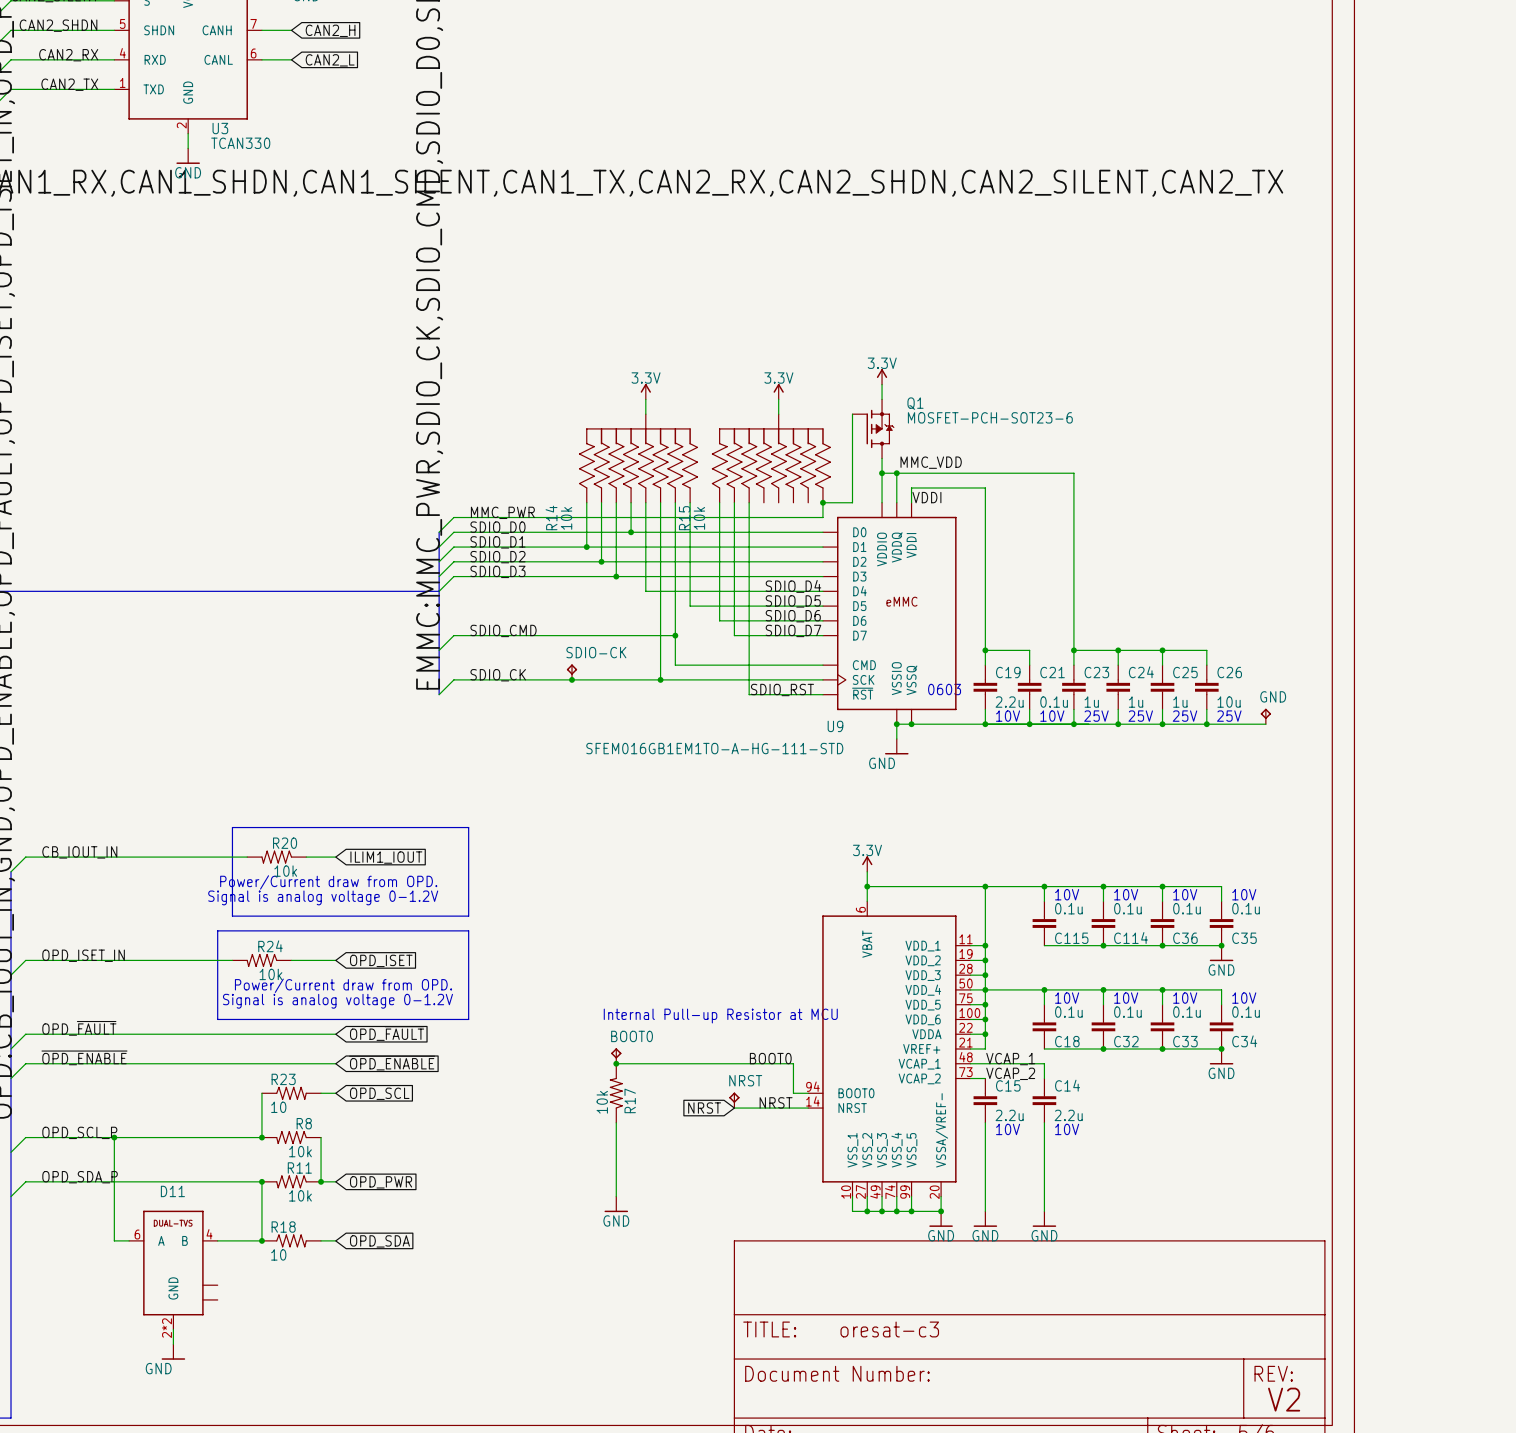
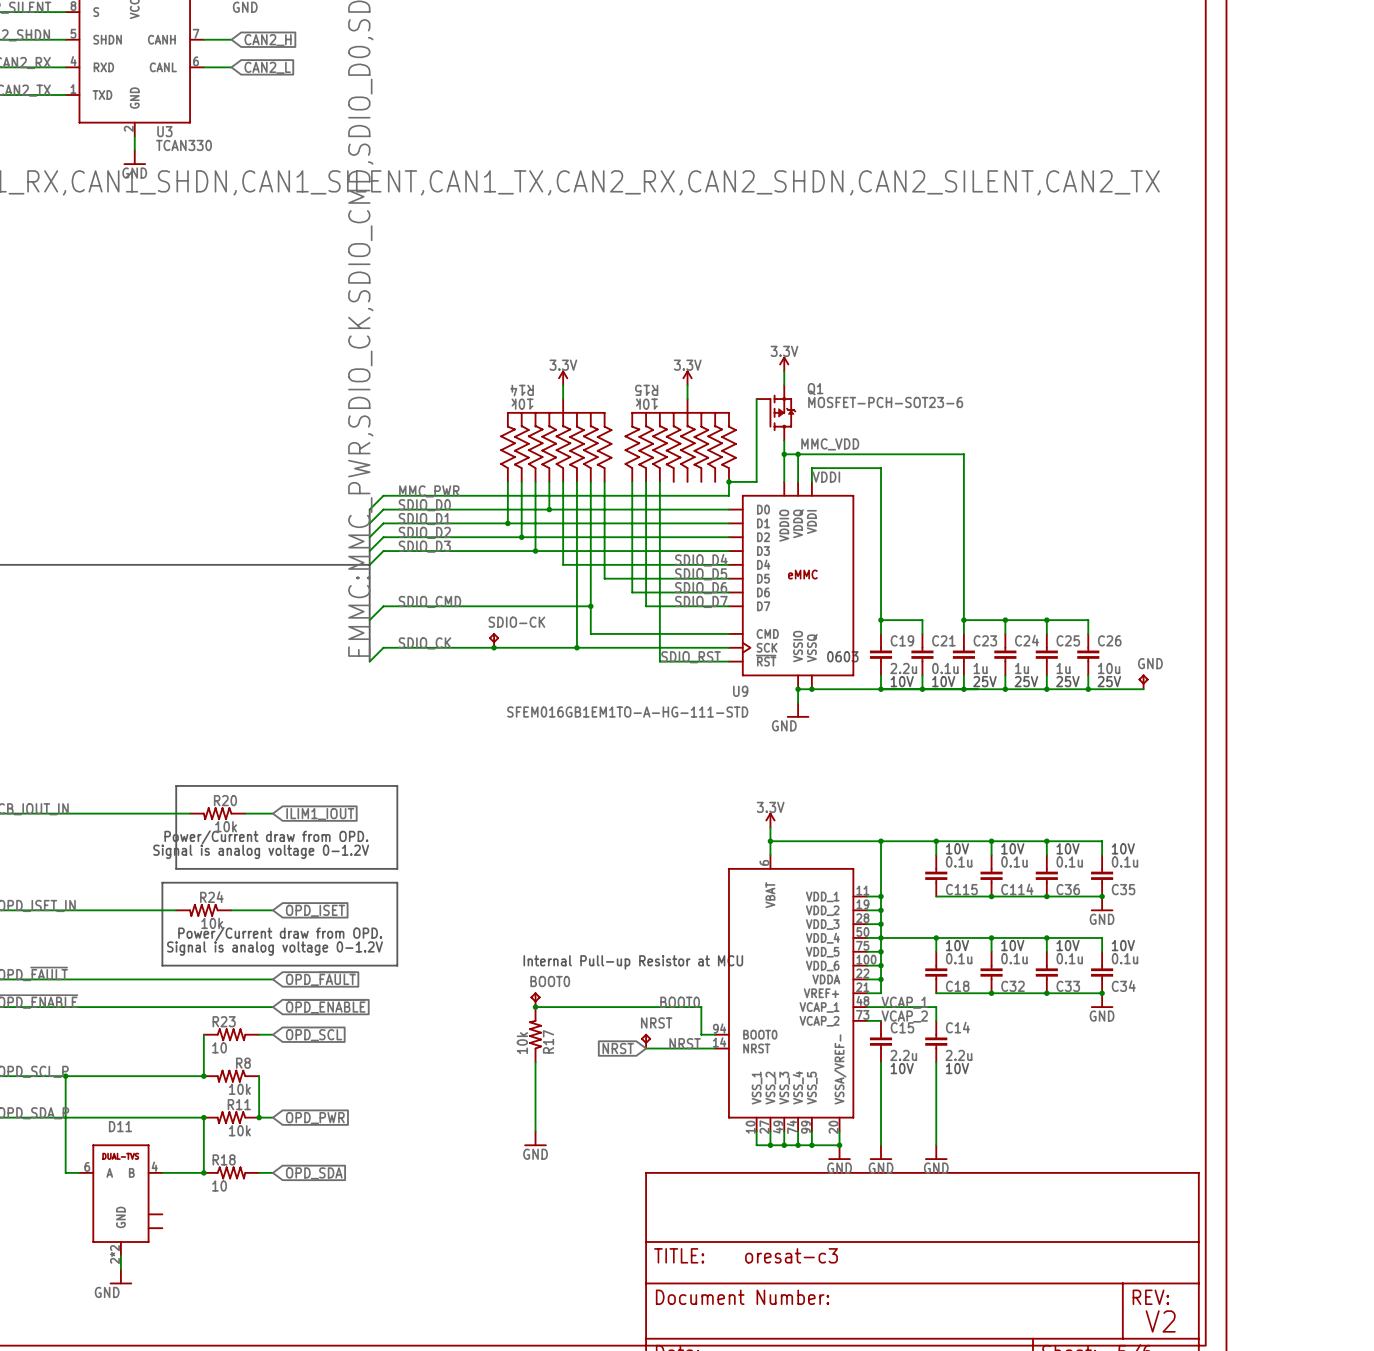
R14 name rotation: 0° (551, 517) -> 90° counterclockwise (522, 390)
R14 name position: R14 (551, 517) -> R14 (522, 390)
R14 value rotation: 0° (566, 518) -> 90° counterclockwise (522, 404)
R14 value position: 10k (566, 518) -> 10k (522, 404)
R15 name rotation: 0° (684, 518) -> 90° counterclockwise (646, 390)
R15 name position: R15 (684, 518) -> R15 (646, 390)
R15 value rotation: 0° (699, 518) -> 90° counterclockwise (646, 404)
R15 value position: 10k (699, 518) -> 10k (646, 404)

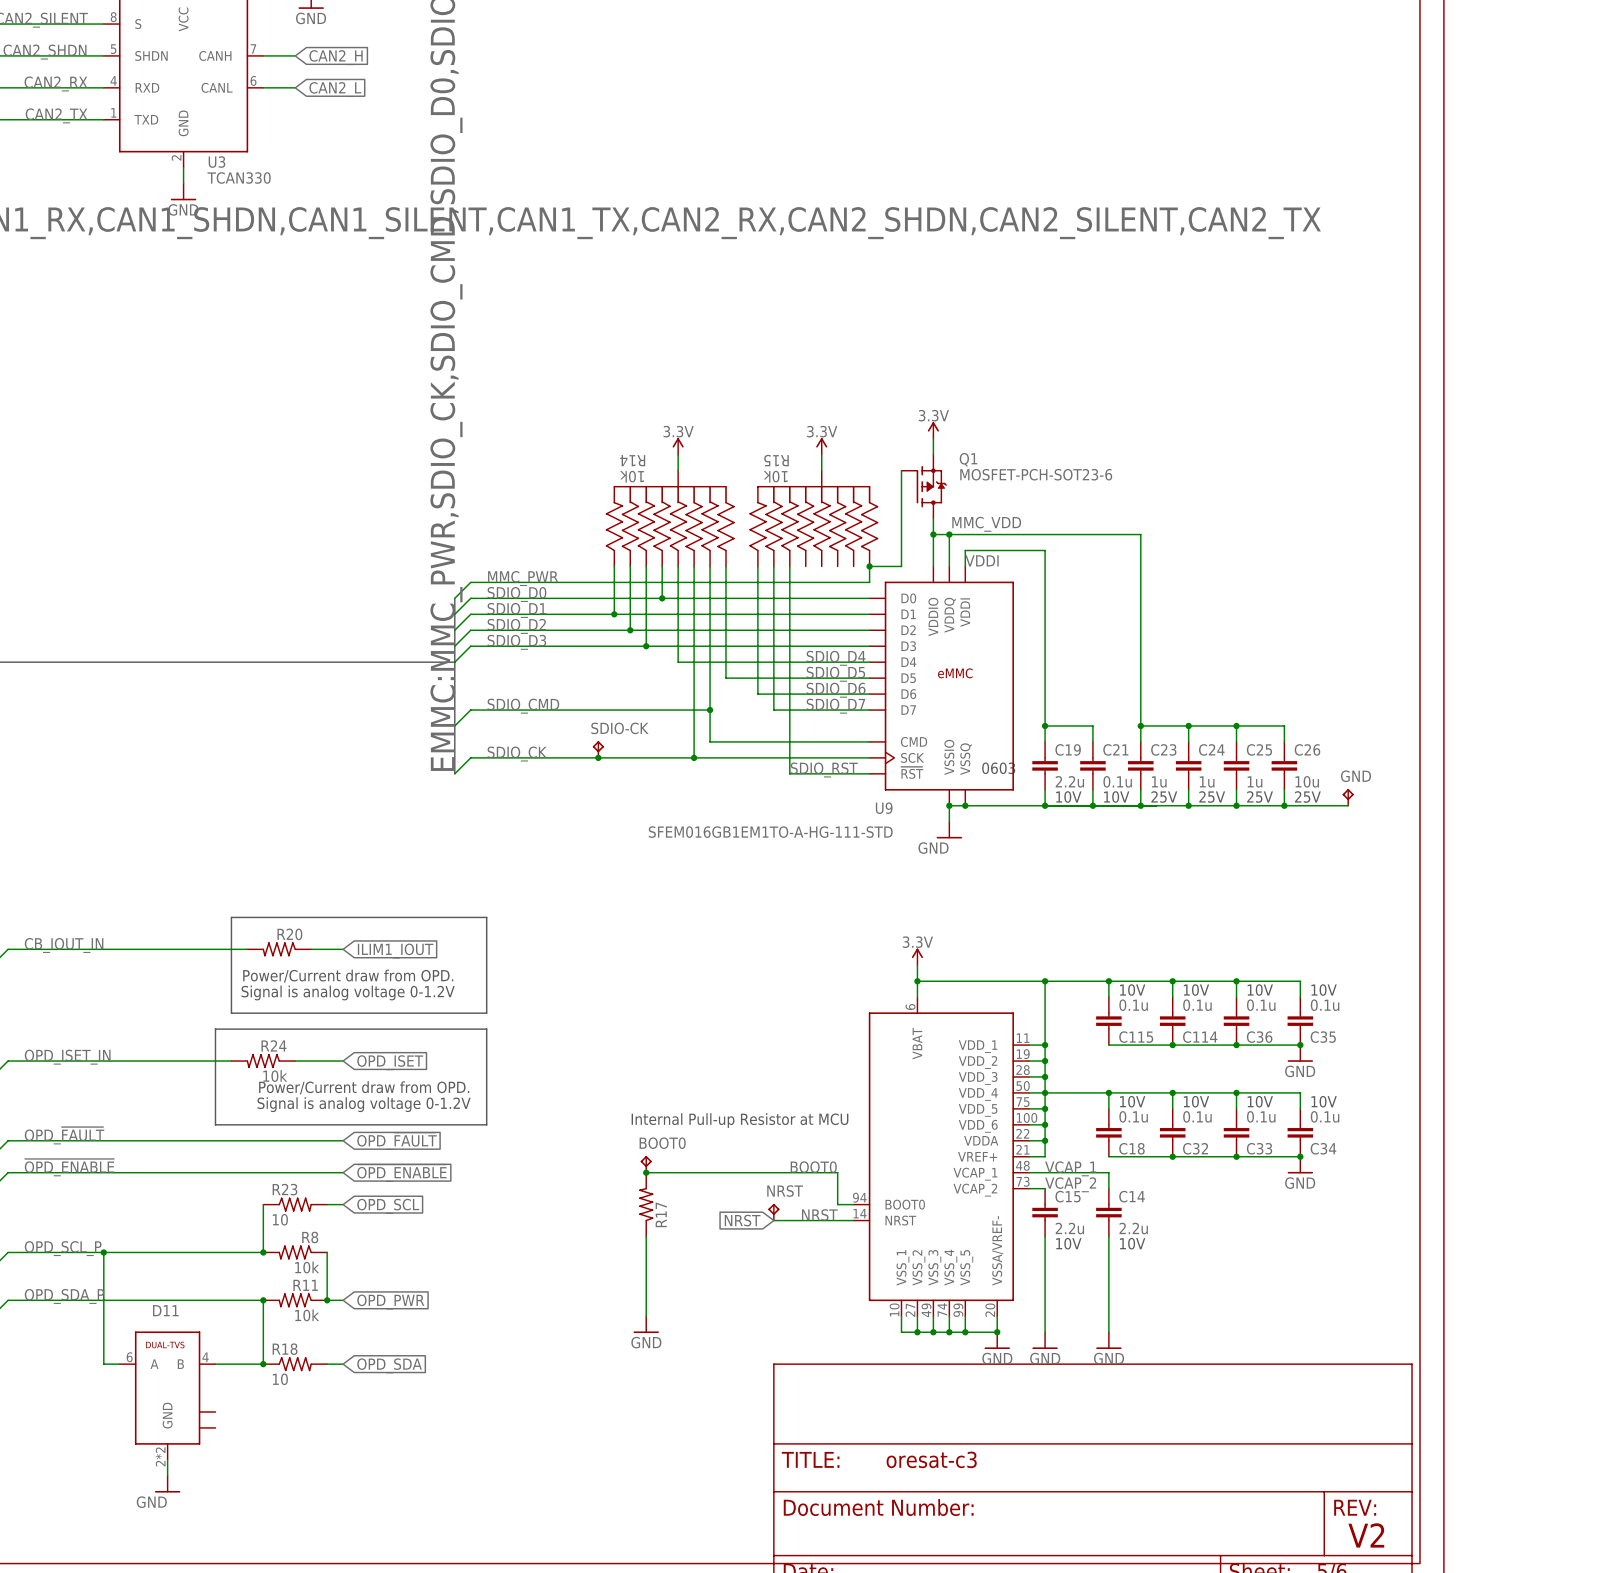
R20 value: 10k (226, 826) -> none
R17 value: 10k (522, 1043) -> none

